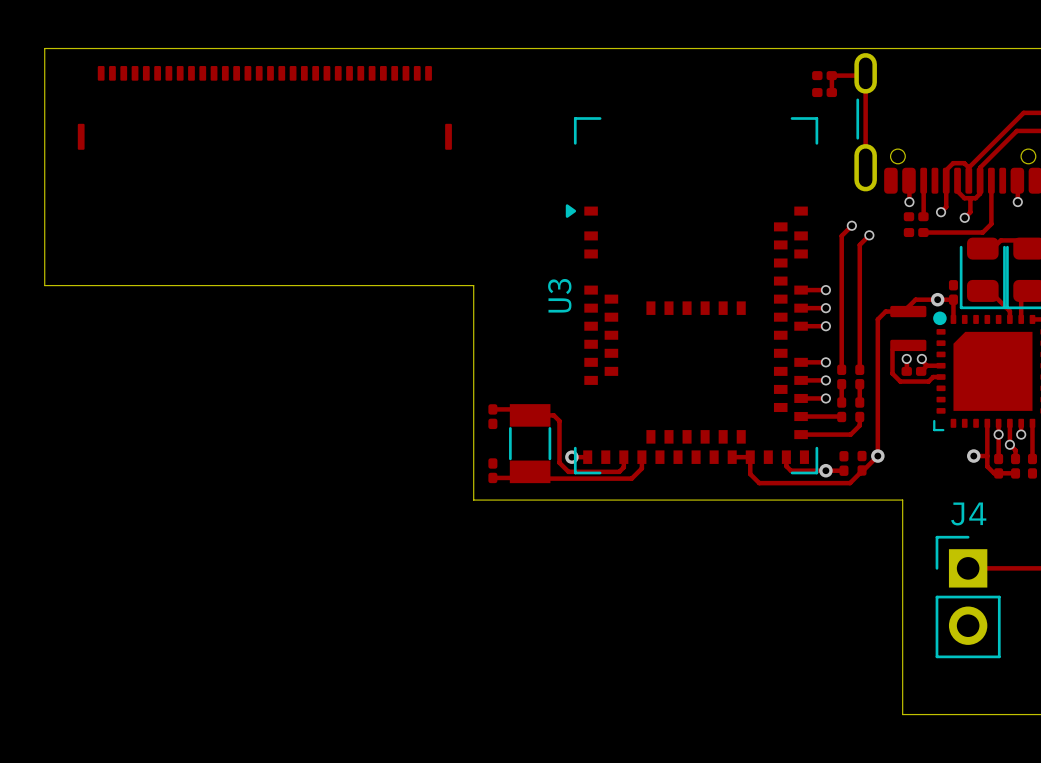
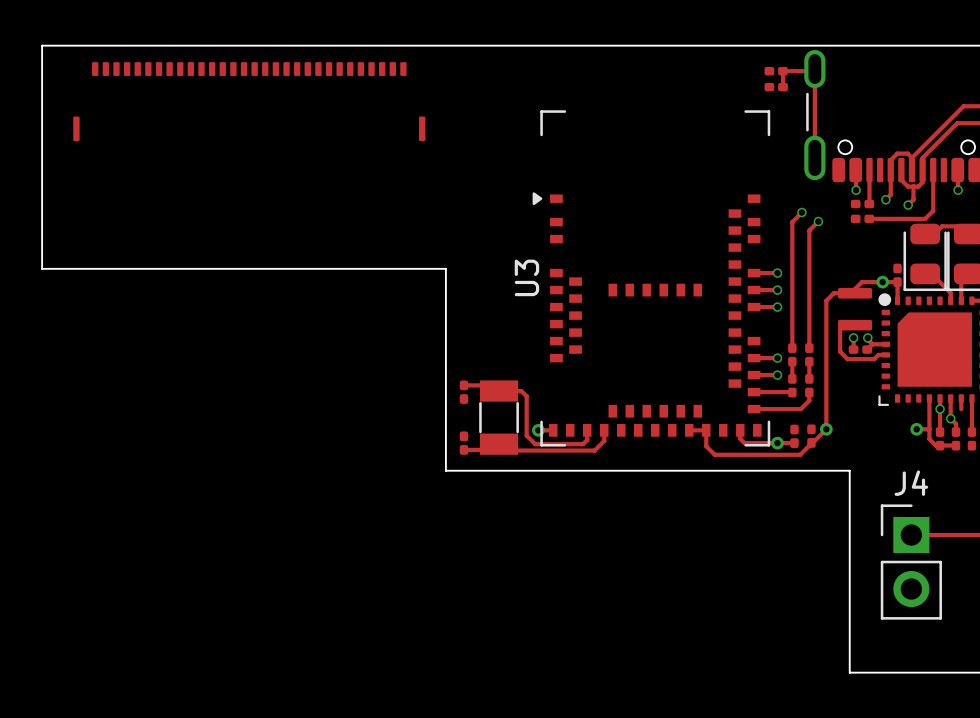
track: (801, 362) (825, 362) -> none
via: (825, 362) -> none
via: (1021, 434) -> none

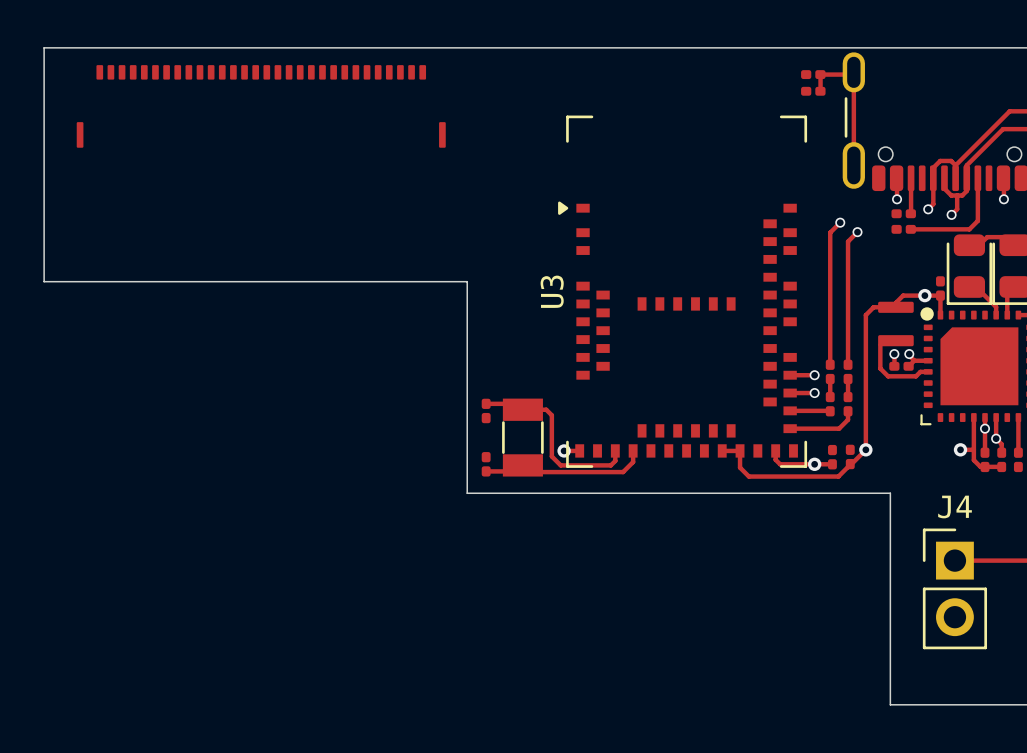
track: (754, 273) (777, 273) -> none
via: (777, 273) -> none
track: (754, 290) (777, 290) -> none
via: (777, 290) -> none
track: (754, 307) (777, 307) -> none
via: (777, 307) -> none
track: (961, 398) (961, 409) -> none

